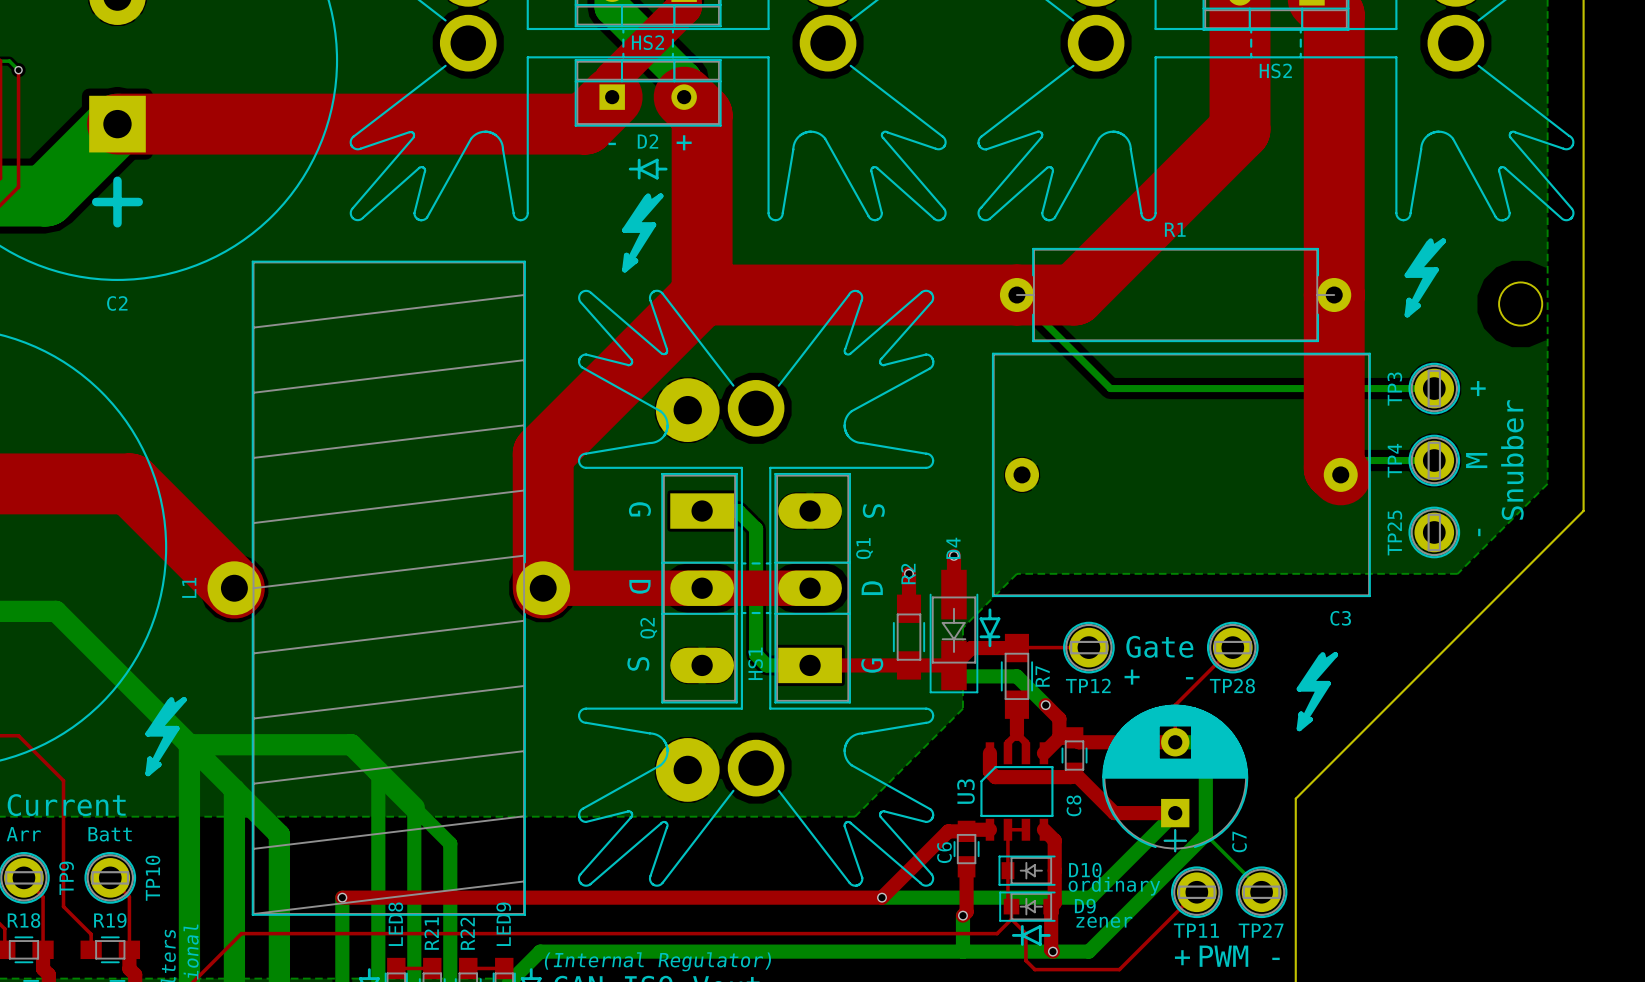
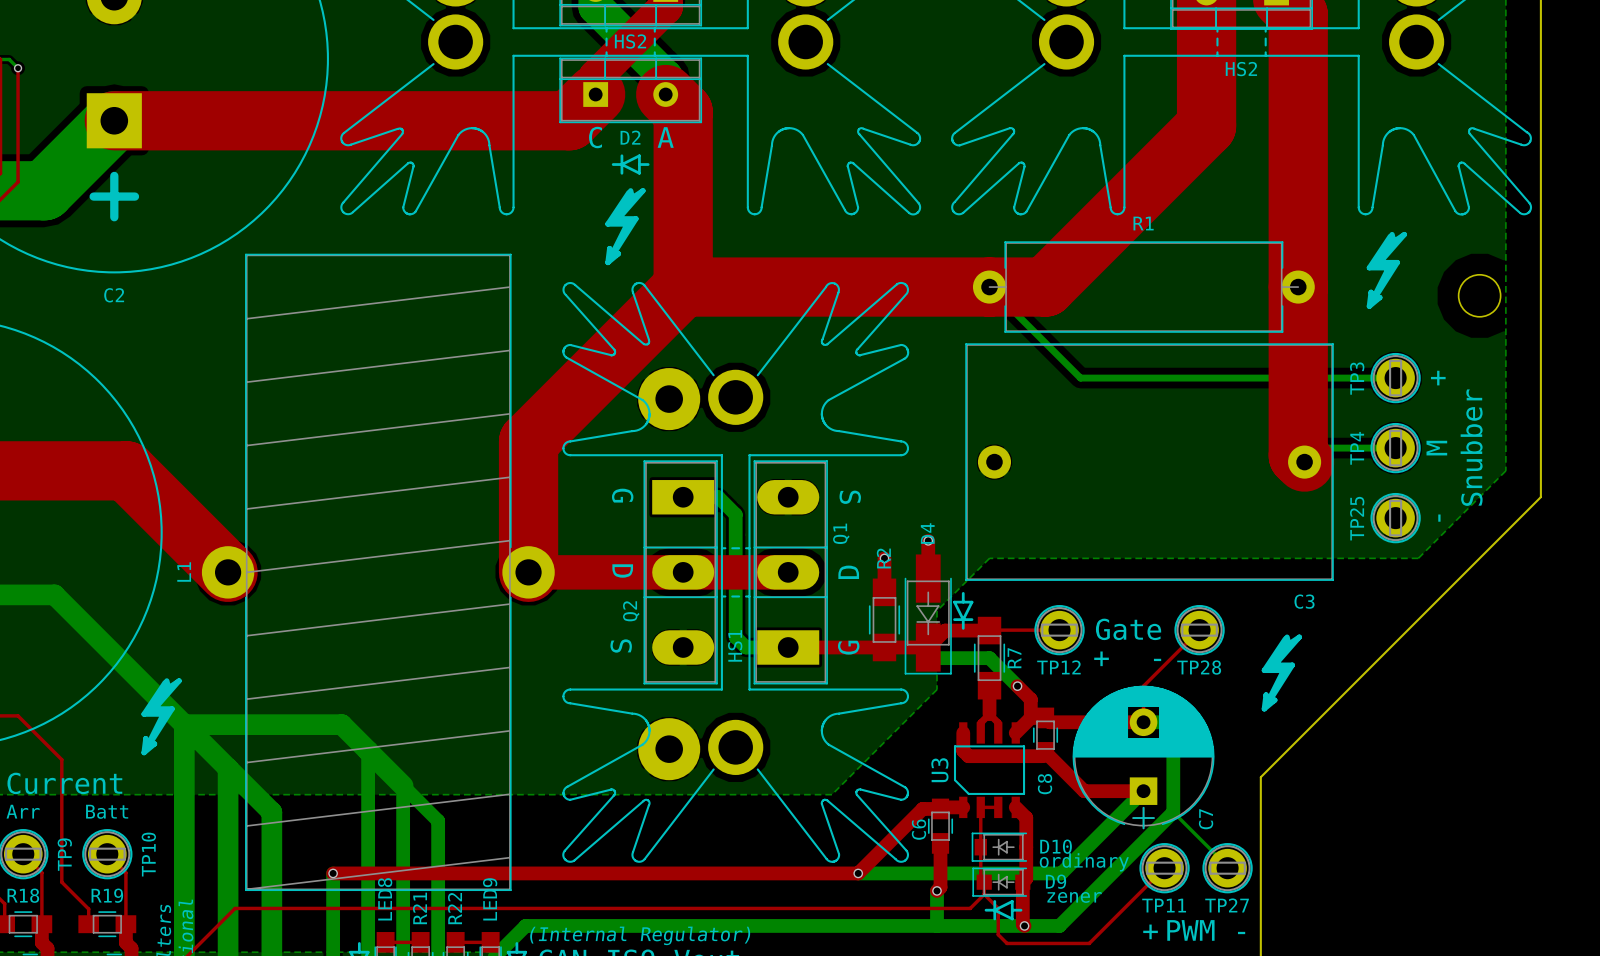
text: + (684, 142) -> A (665, 137)
text: - (612, 143) -> C (595, 137)
U3 footprint: [980, 742, 1054, 841] -> [953, 722, 1026, 819]

